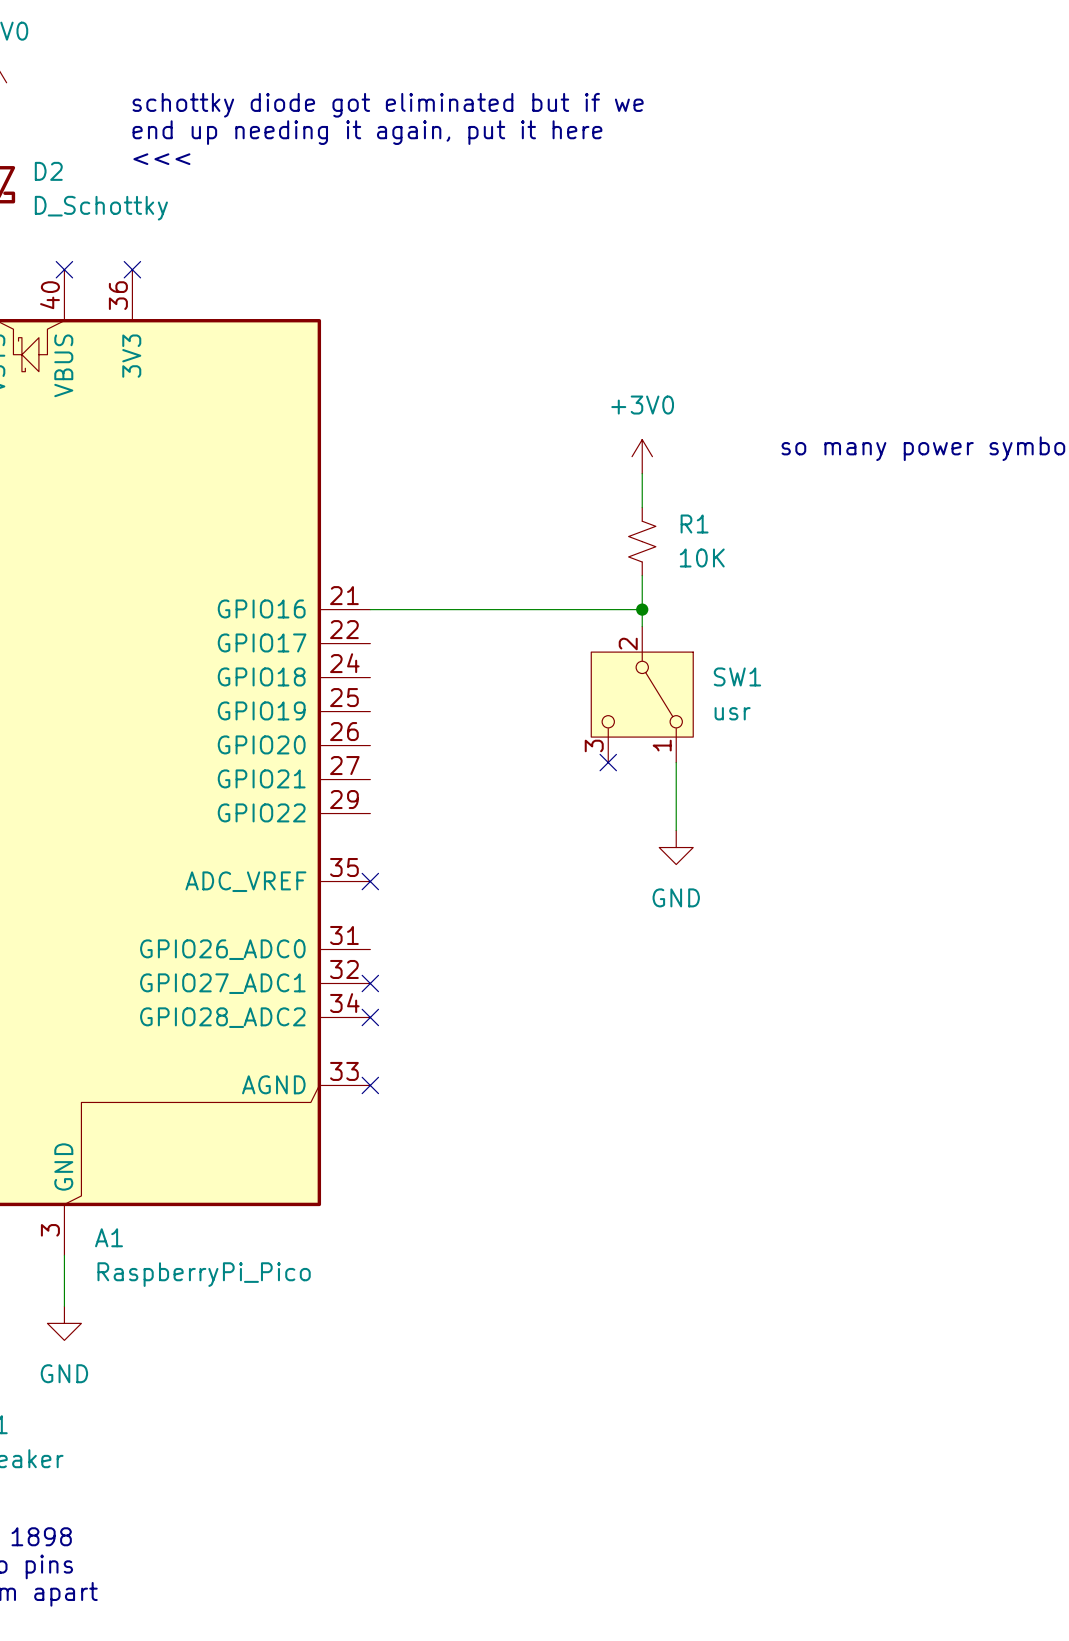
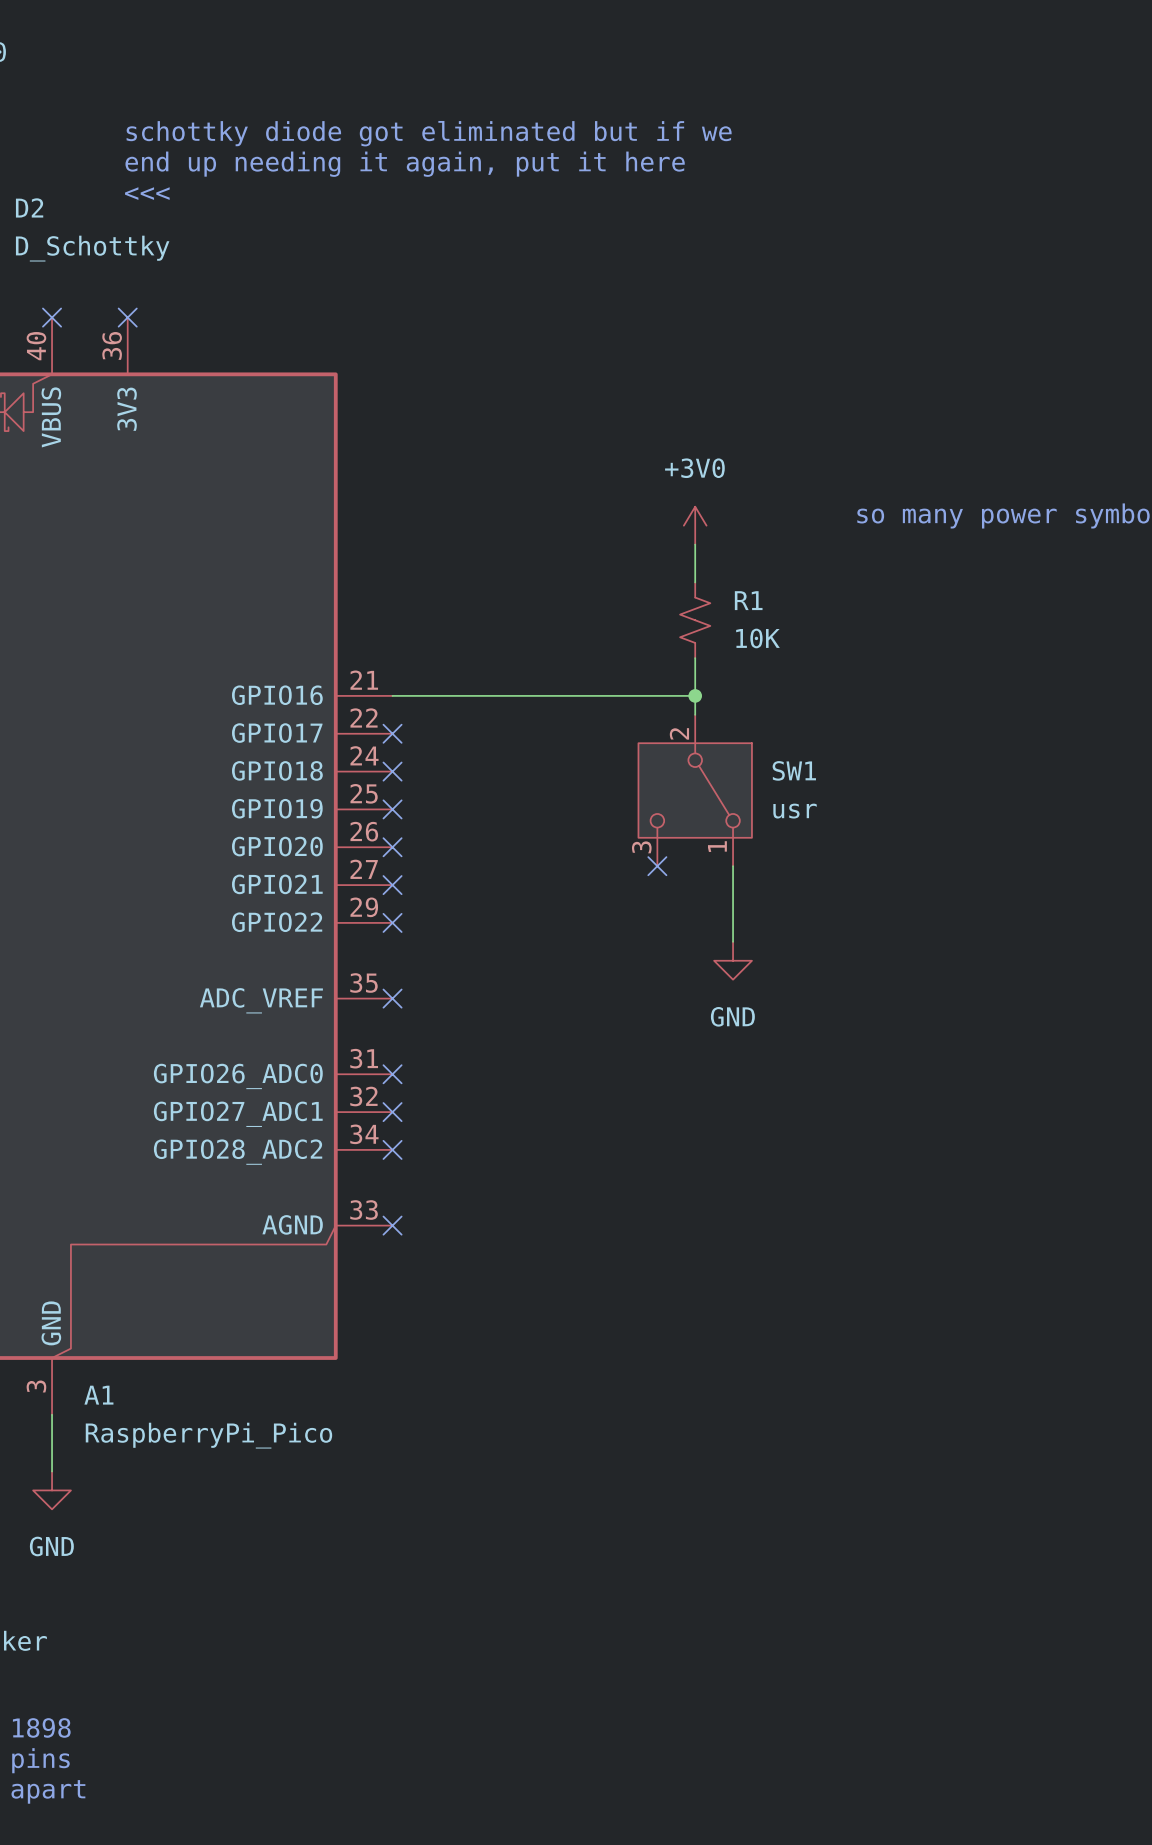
no-connect mark: none -> (392, 733)
no-connect mark: none -> (392, 771)
no-connect mark: none -> (392, 809)
no-connect mark: none -> (392, 847)
no-connect mark: none -> (392, 885)
no-connect mark: none -> (392, 922)
no-connect mark: none -> (392, 1074)

